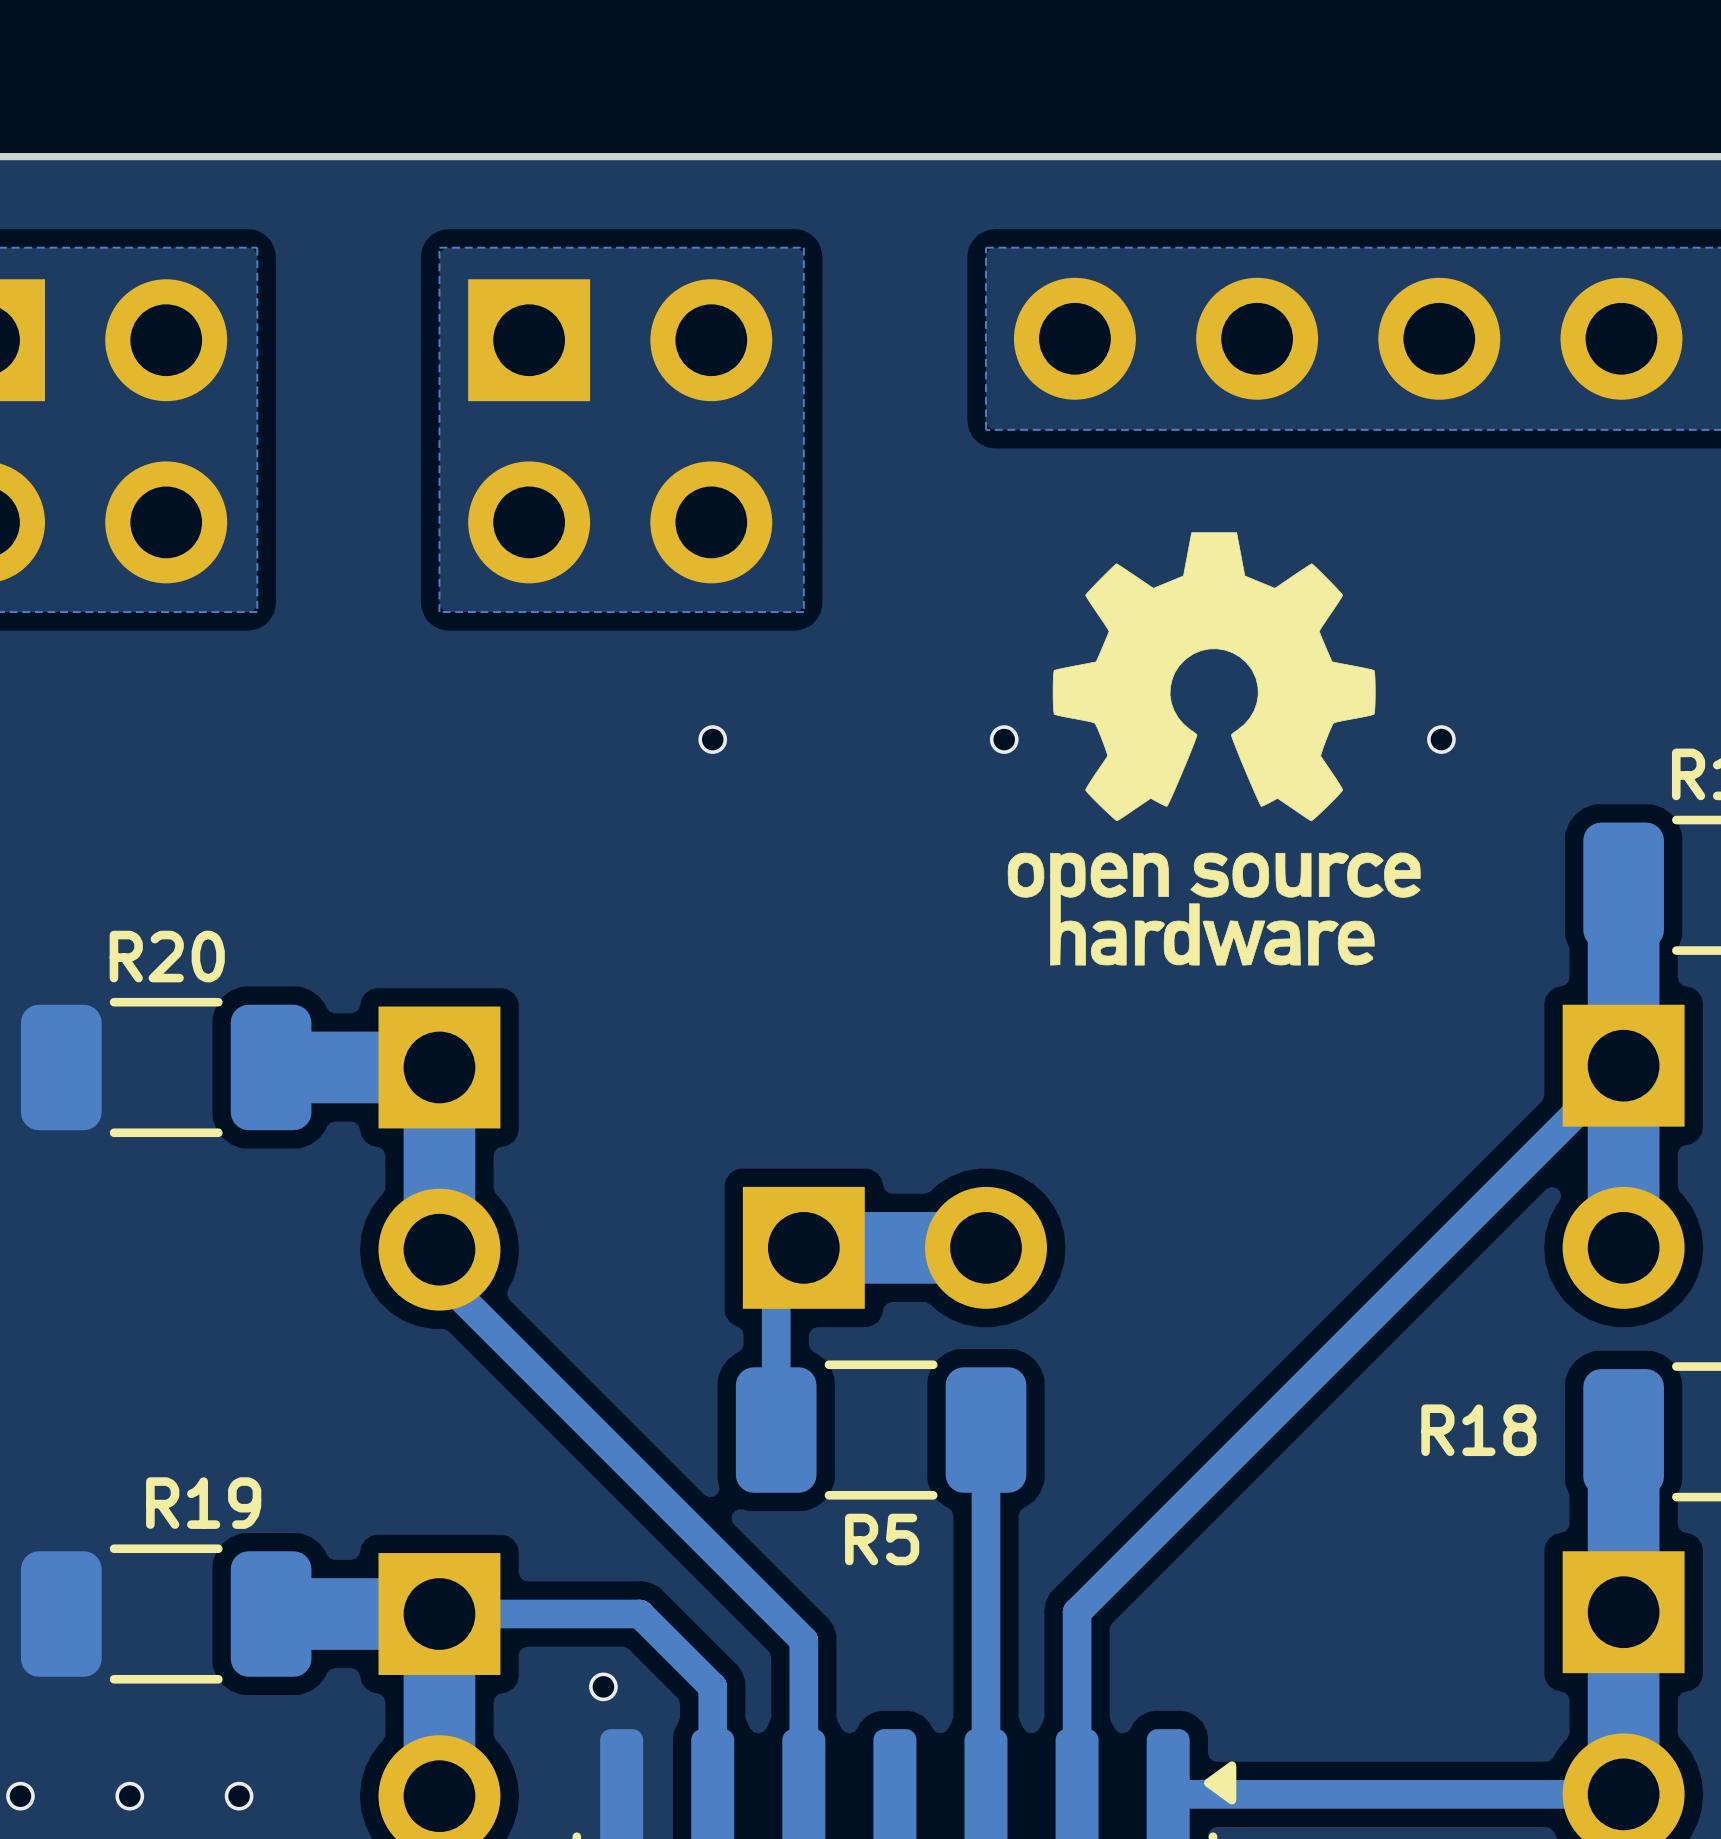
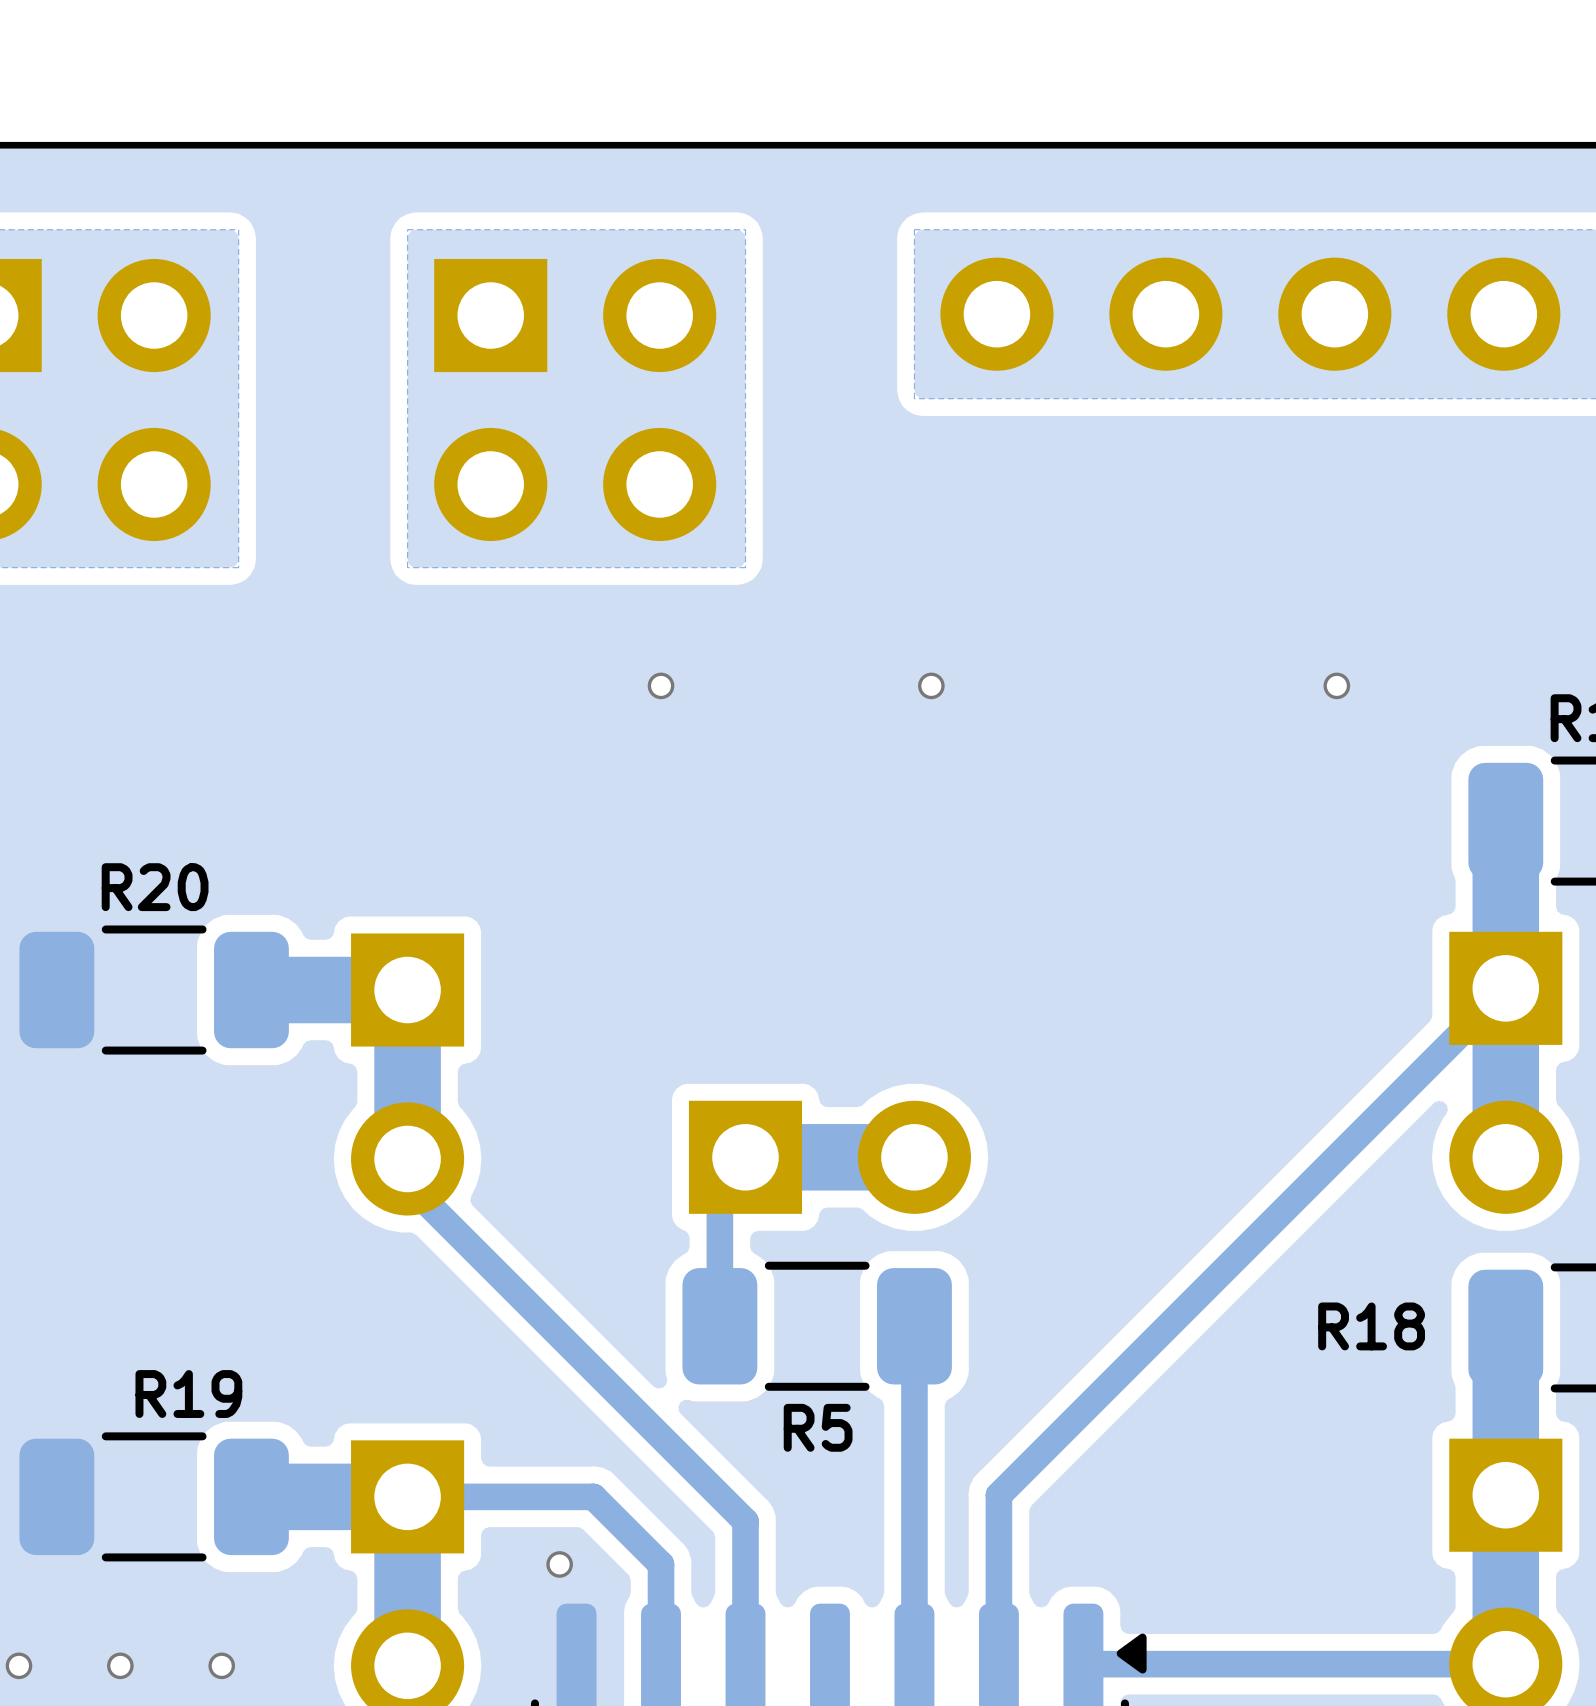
drawing: [1007, 532, 1421, 966] -> none

